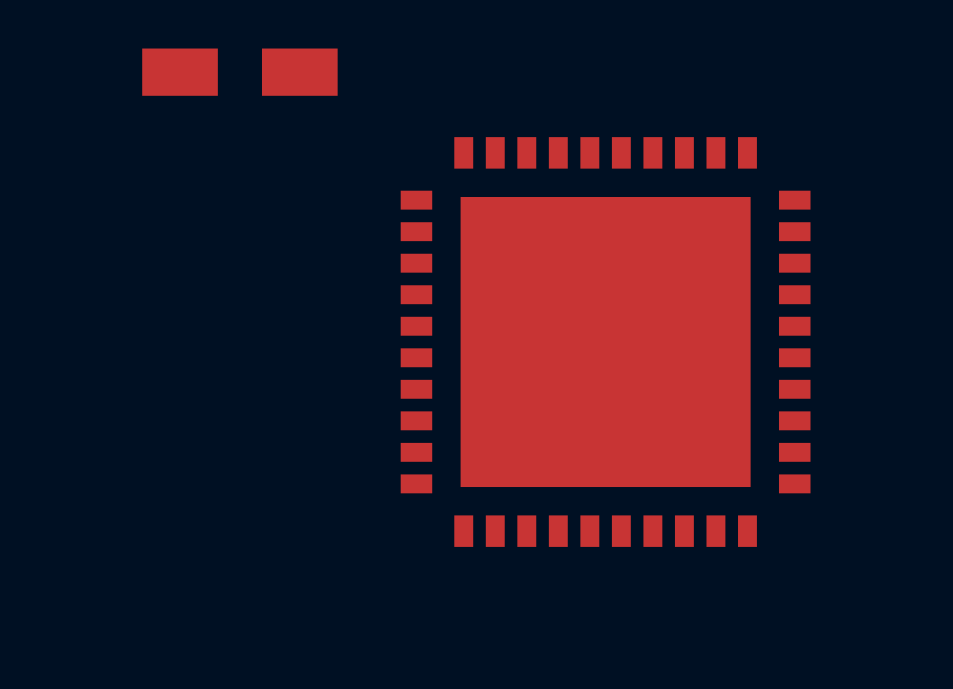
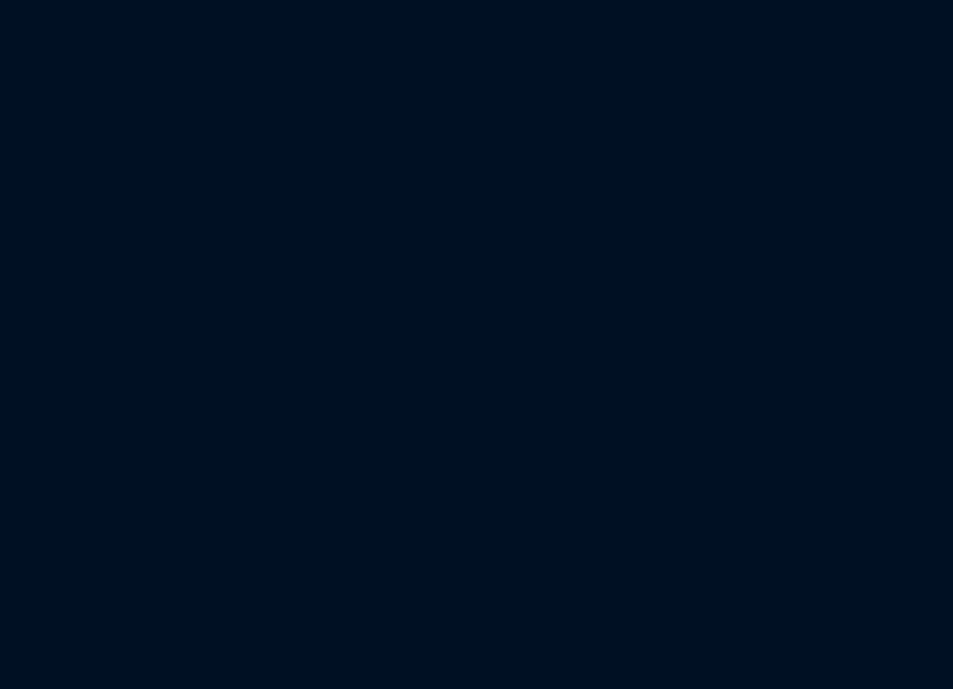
part: (239, 72) -> none
part: (605, 342) -> none

